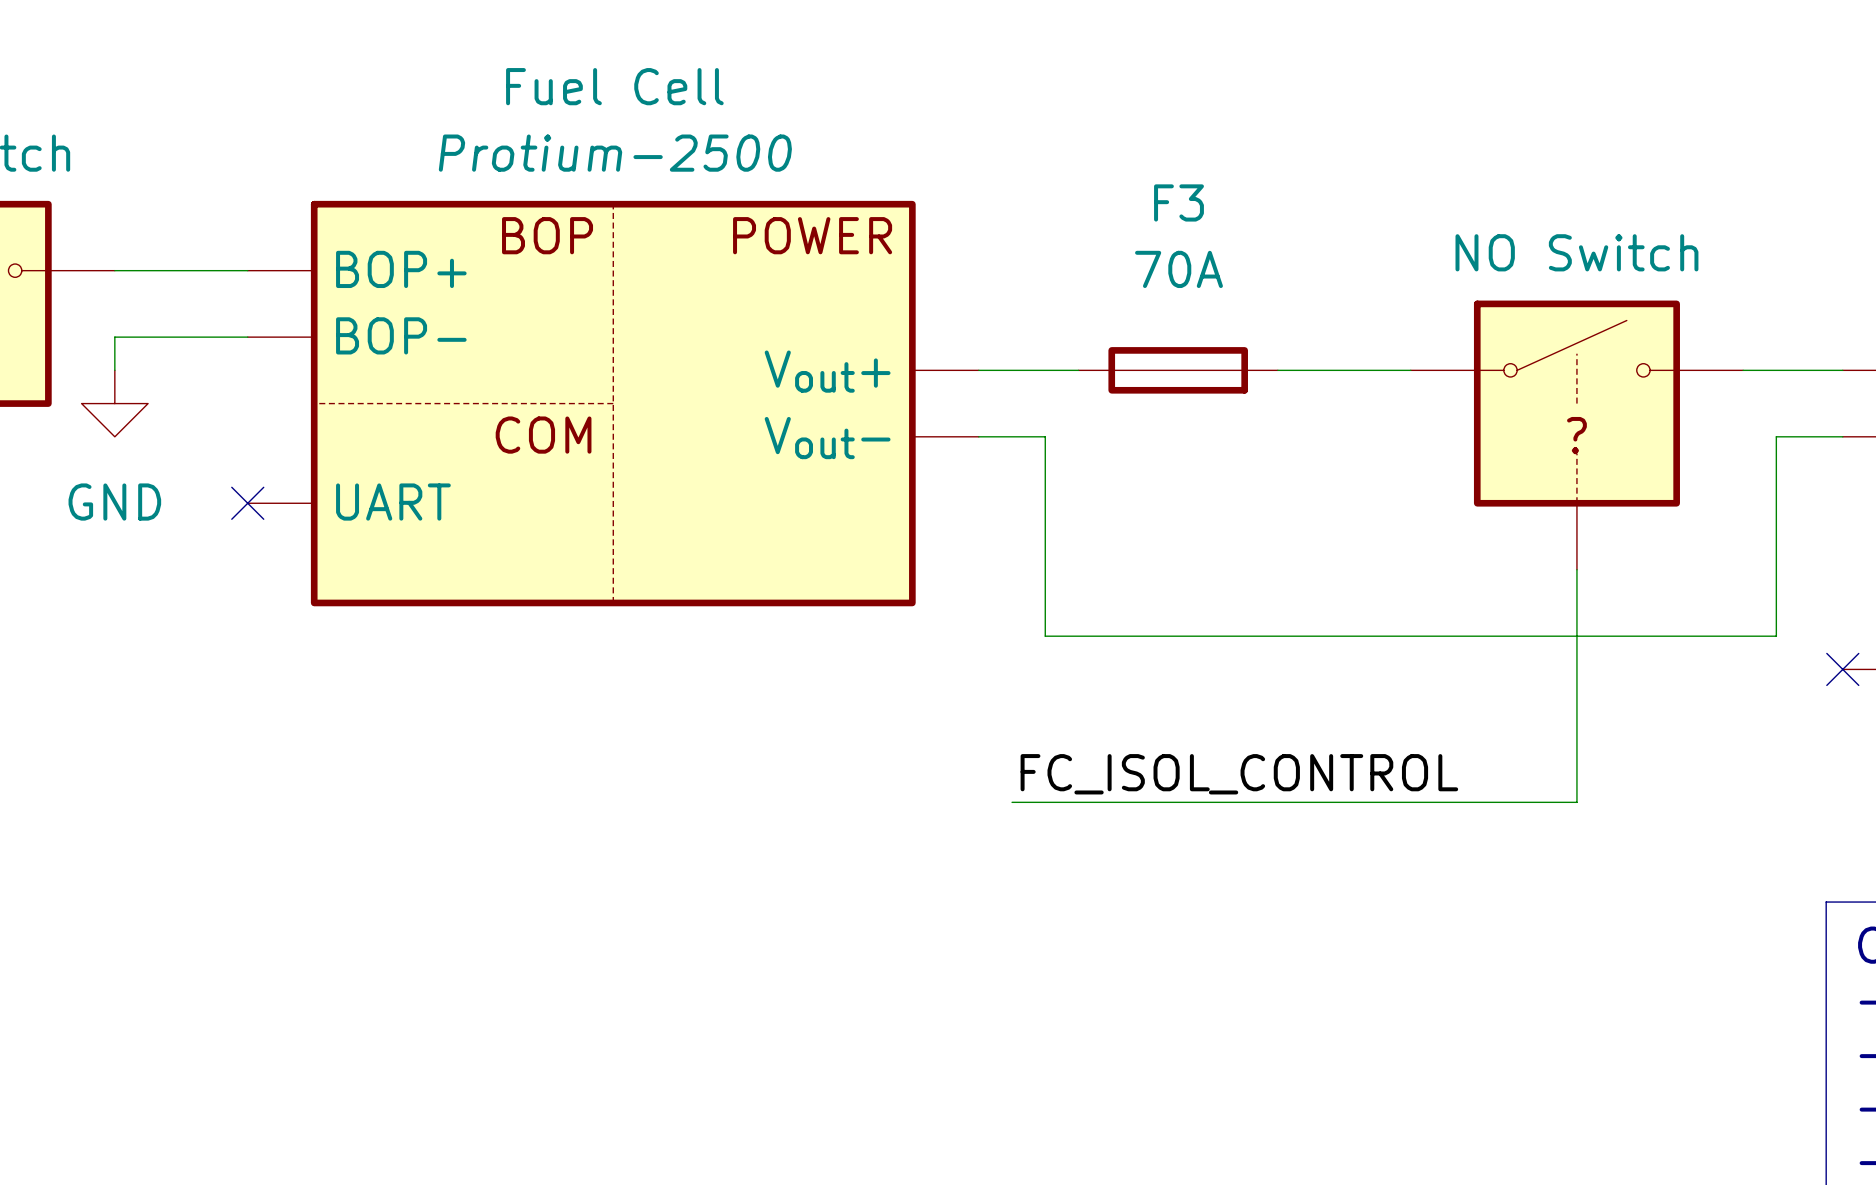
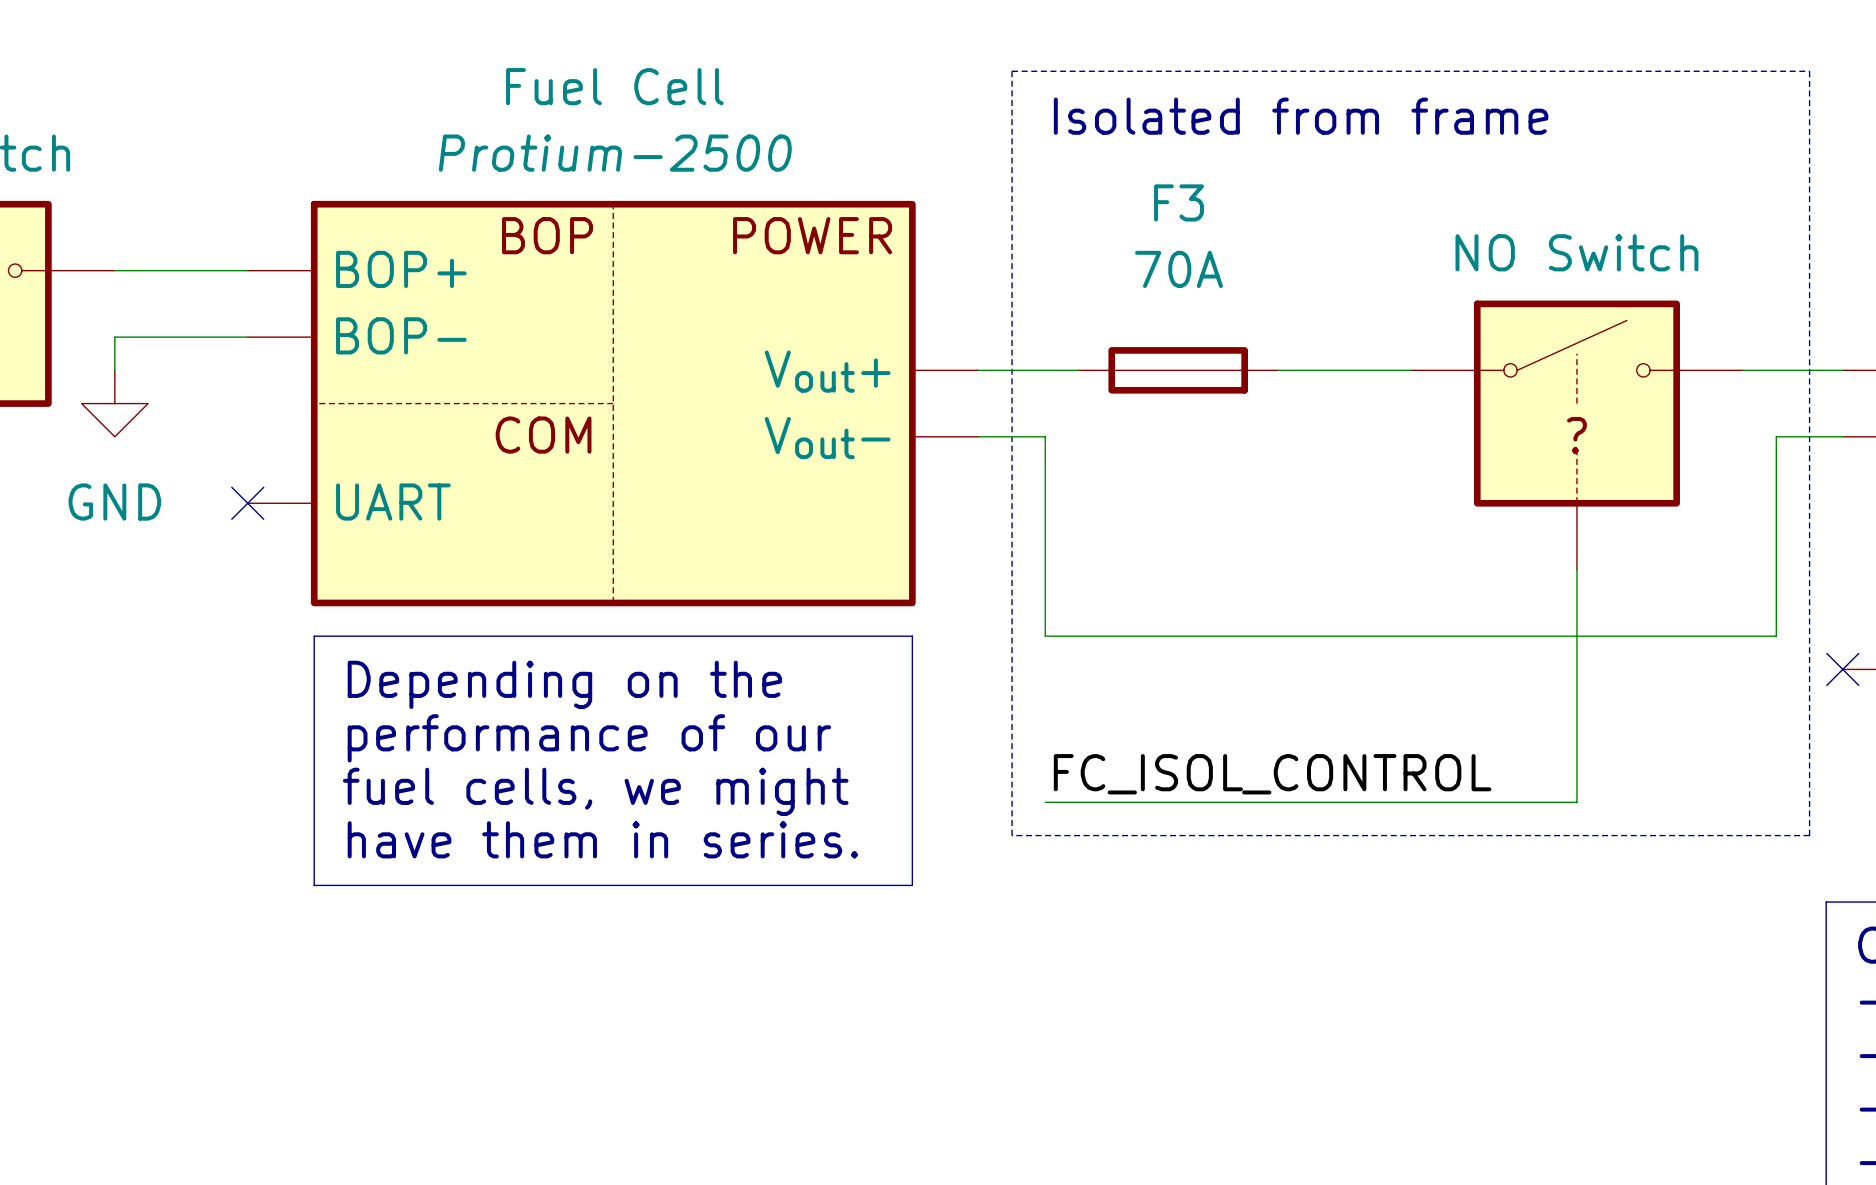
line: none -> (1012, 71) (1809, 71) (1809, 835) (1012, 835) (1012, 71)
text: none -> Isolated from frame (1301, 116)
line: none -> (314, 636) (912, 636) (912, 885) (314, 885) (314, 636)
text: none -> Depending on the (564, 684)
text: none -> performance of our (589, 738)
label position: FC_ISOL_CONTROL (1239, 774) -> FC_ISOL_CONTROL (1272, 774)
text: none -> fuel cells, we might (595, 791)
wire: (1012, 802) (1045, 802) -> none
text: none -> have them in series. (602, 839)

